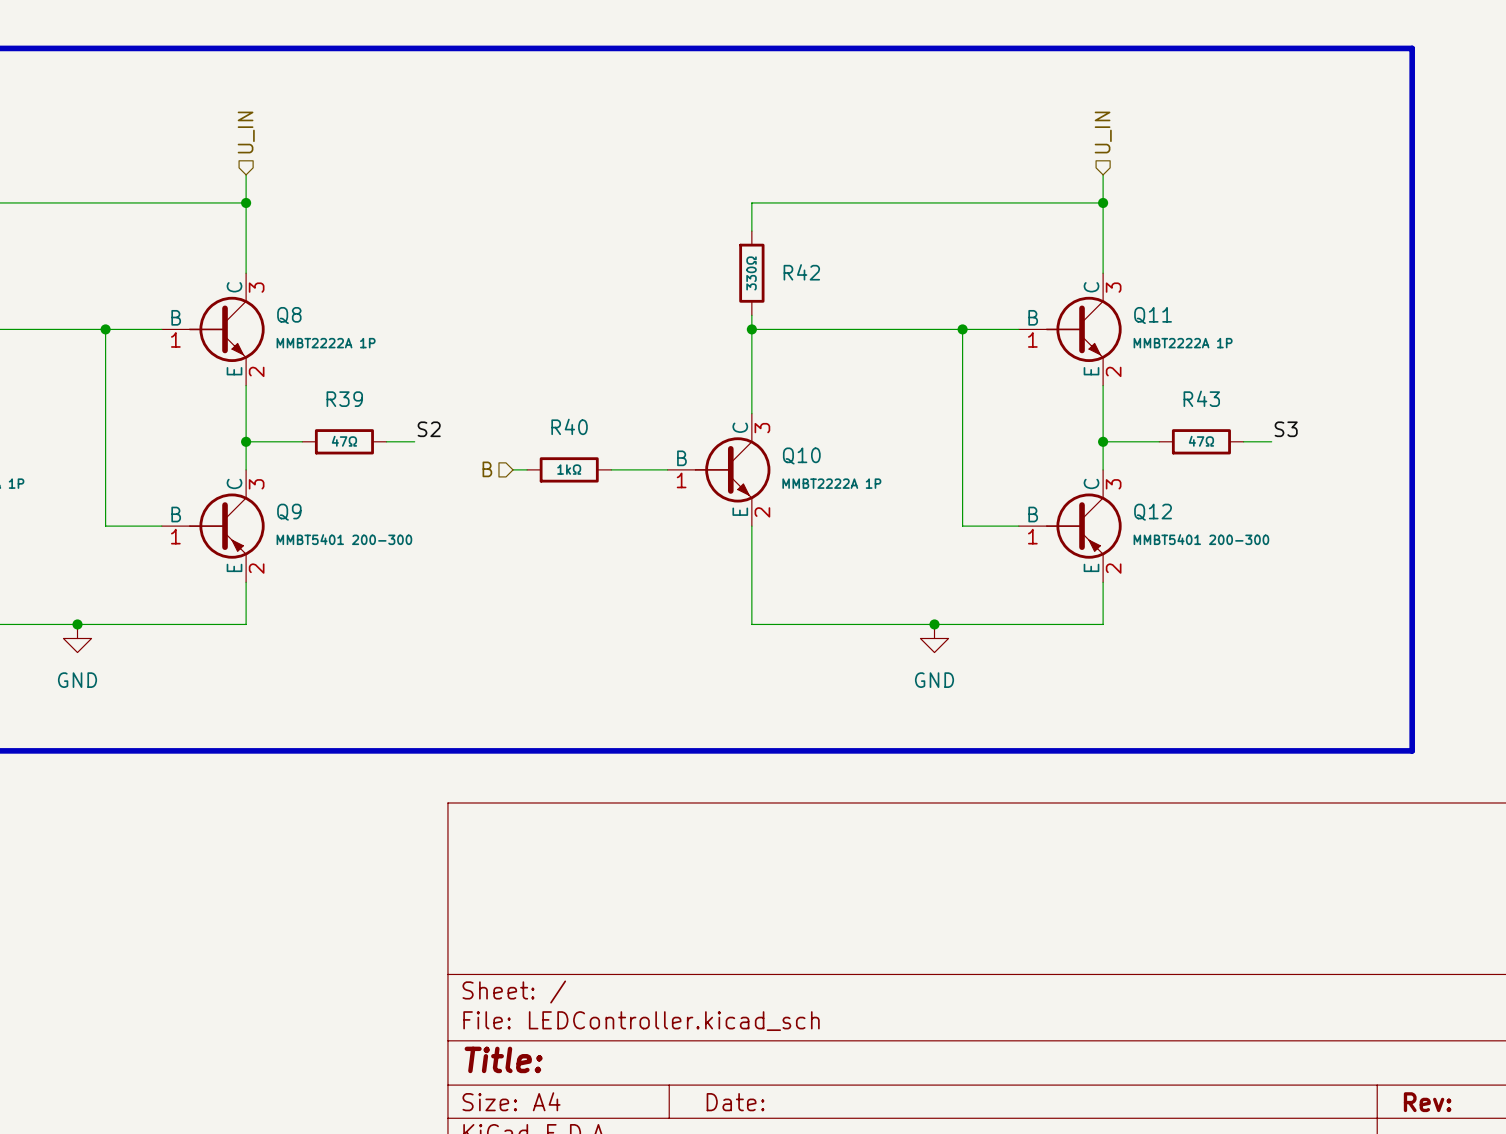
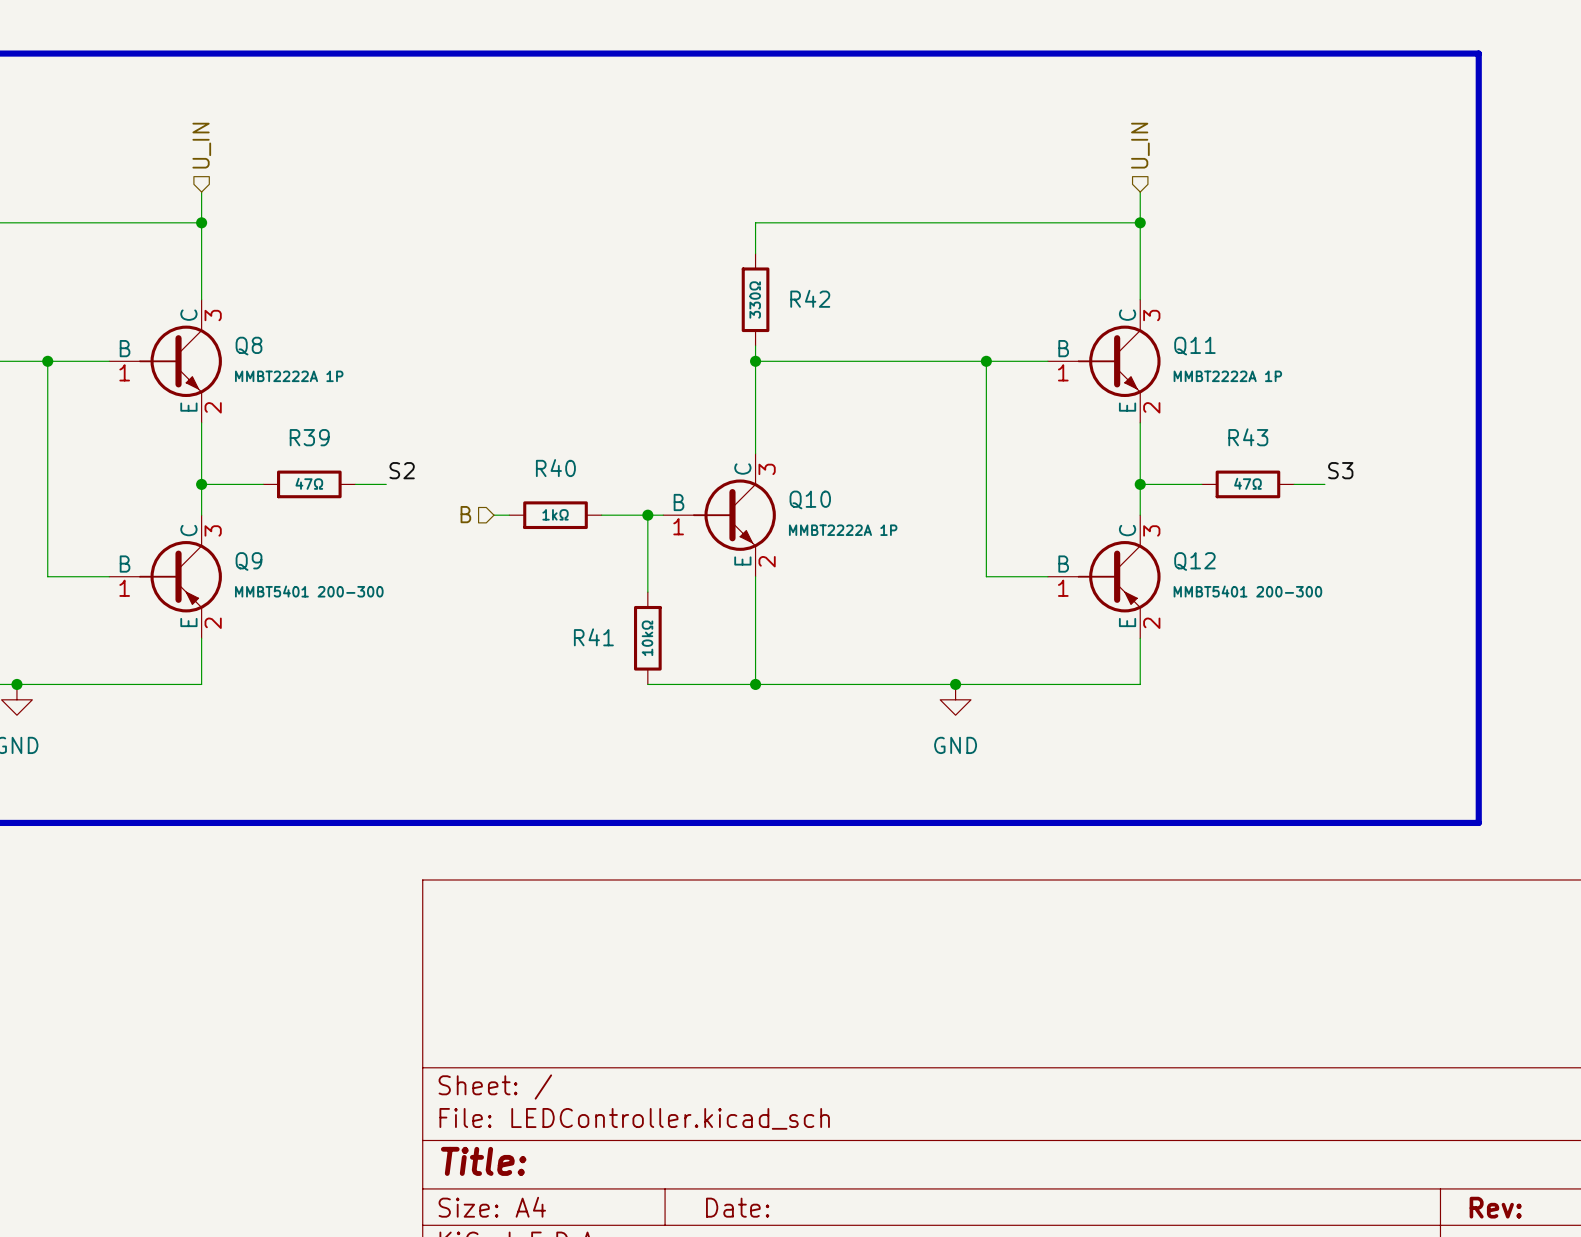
wire: none -> (647, 515) (647, 592)
junction: none -> (647, 515)
R41: none -> 10kΩ (647, 638)
wire: none -> (647, 684) (755, 684)
junction: none -> (755, 684)

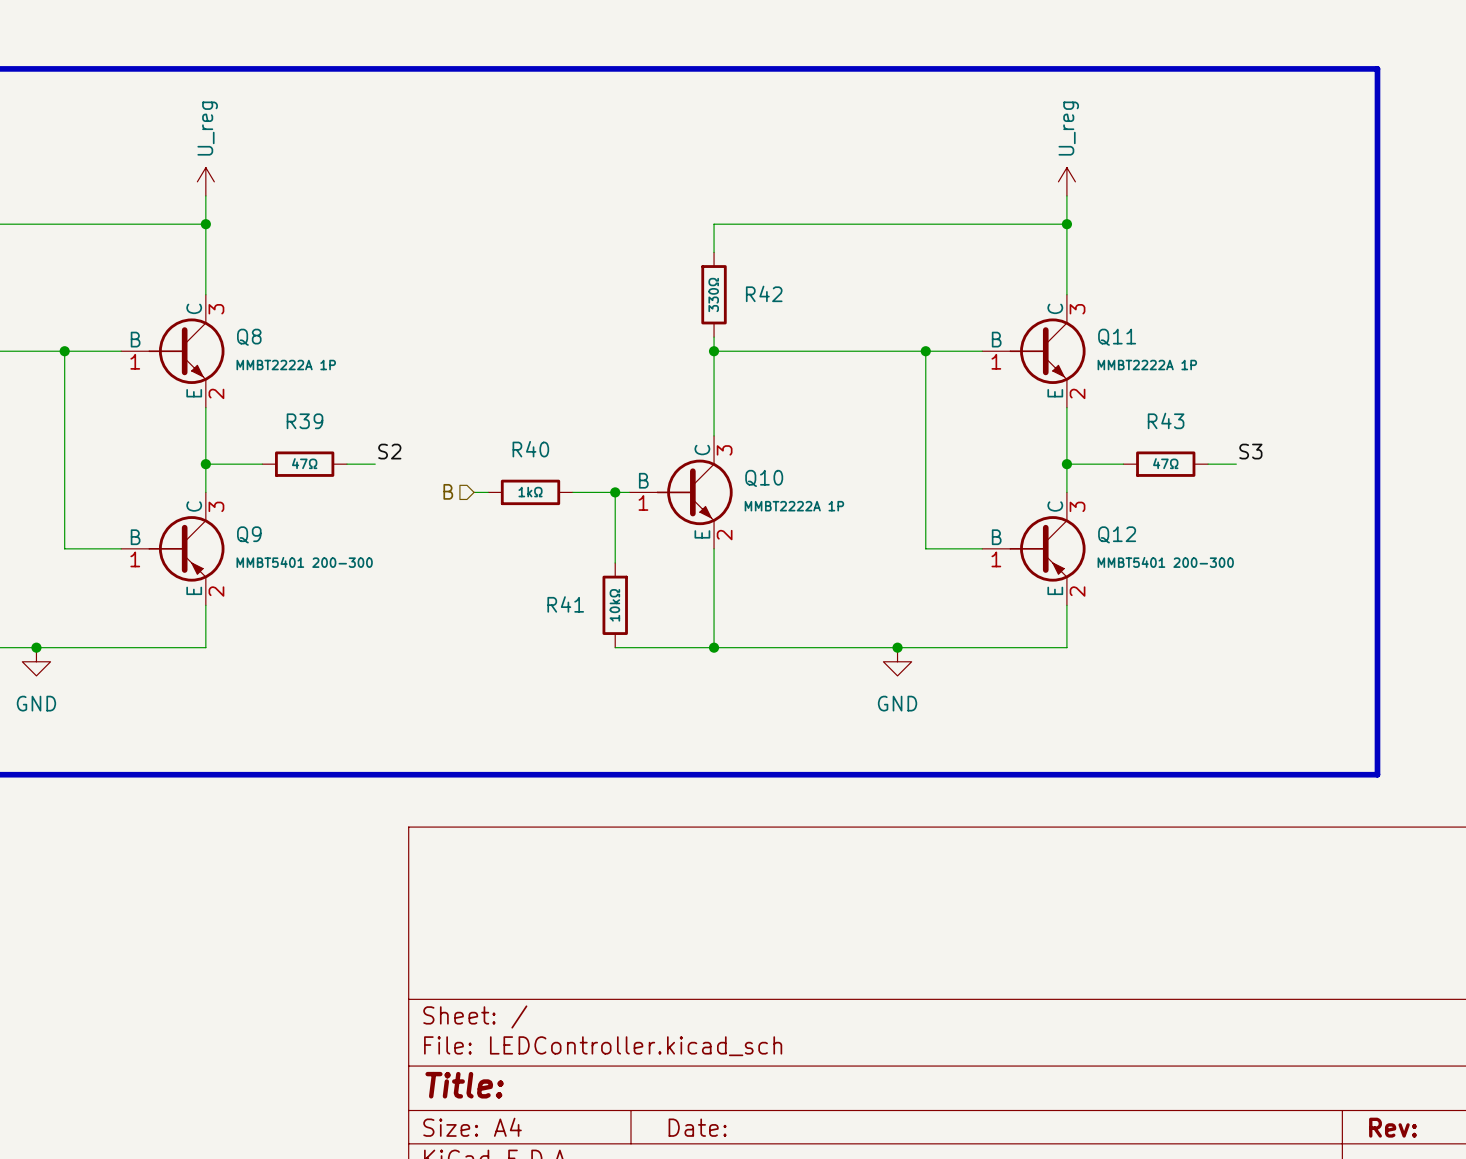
hierarchical label: U_IN (201, 145) -> none
hierarchical label: U_IN (1140, 145) -> none
power symbol: none -> U_reg (205, 181)
power symbol: none -> U_reg (1066, 181)

